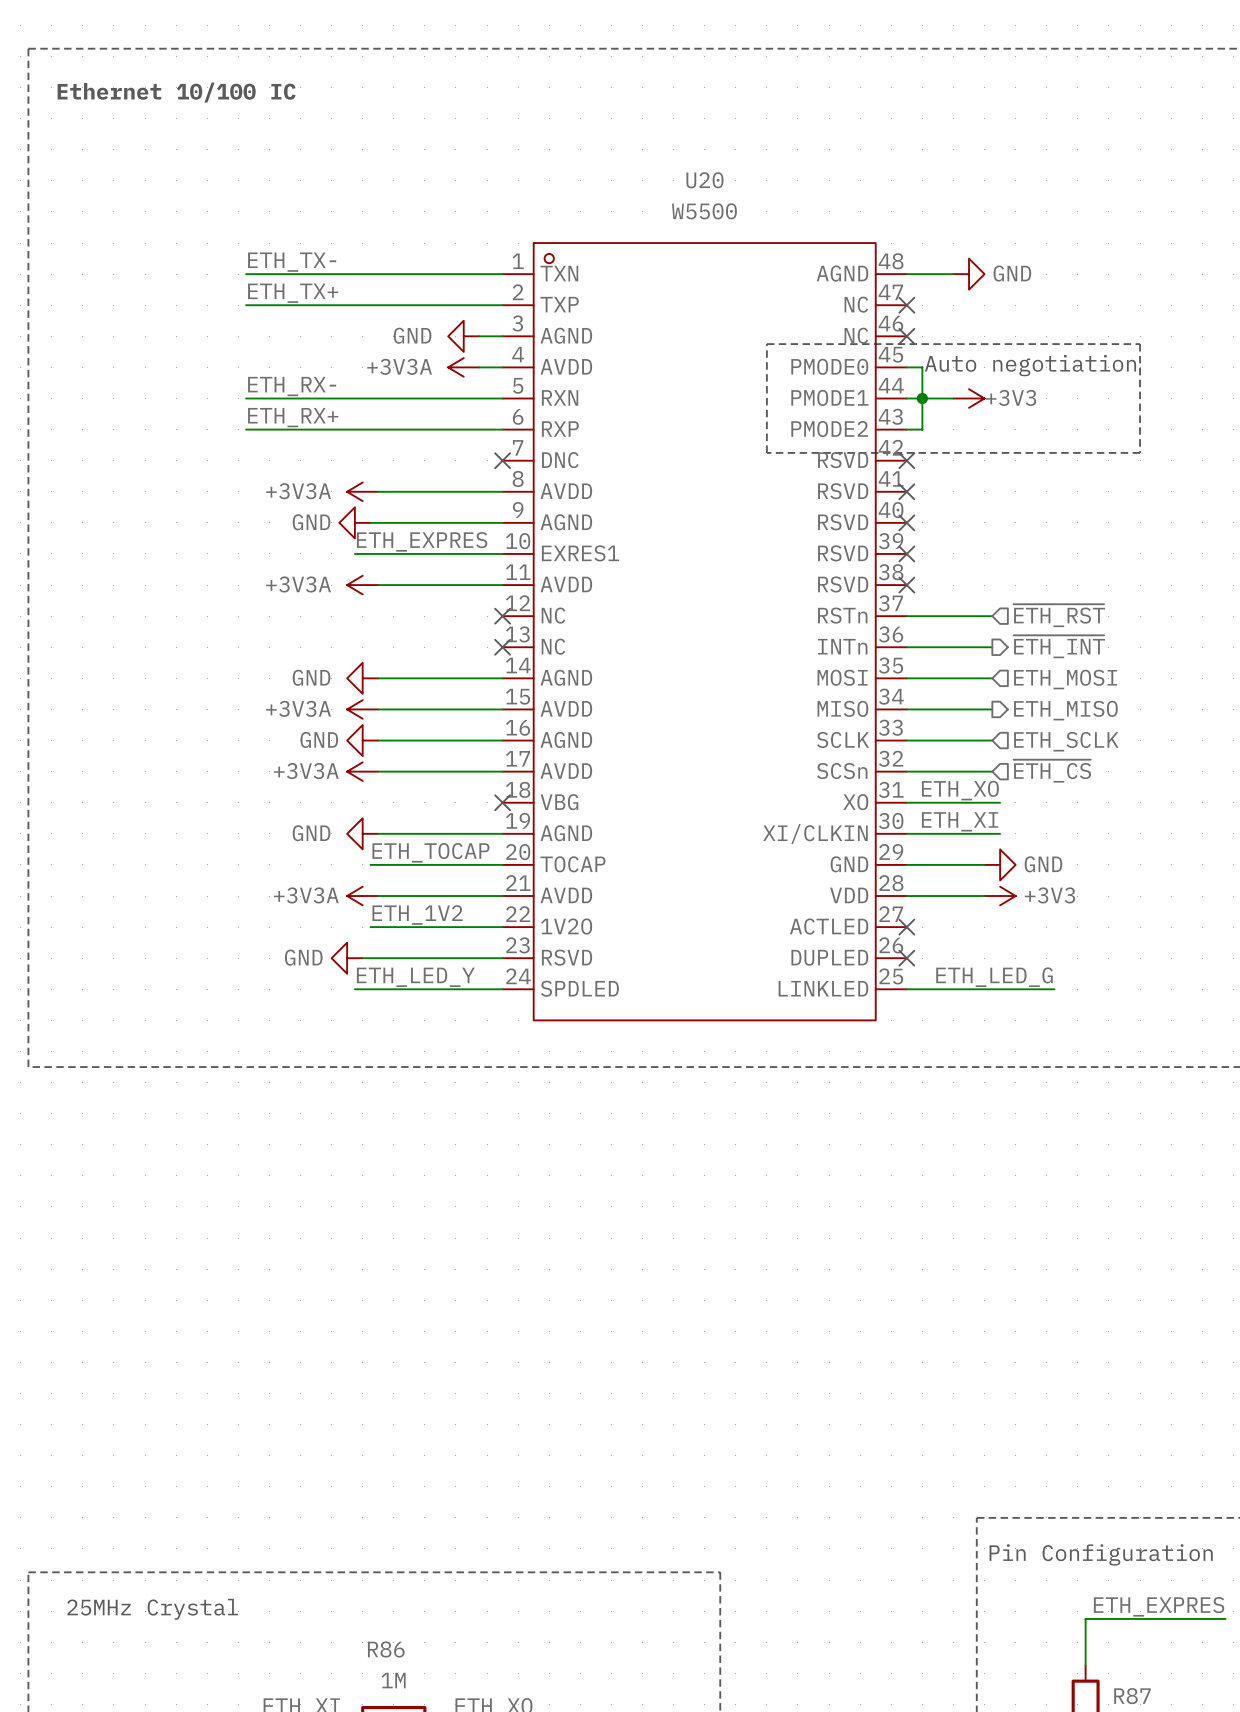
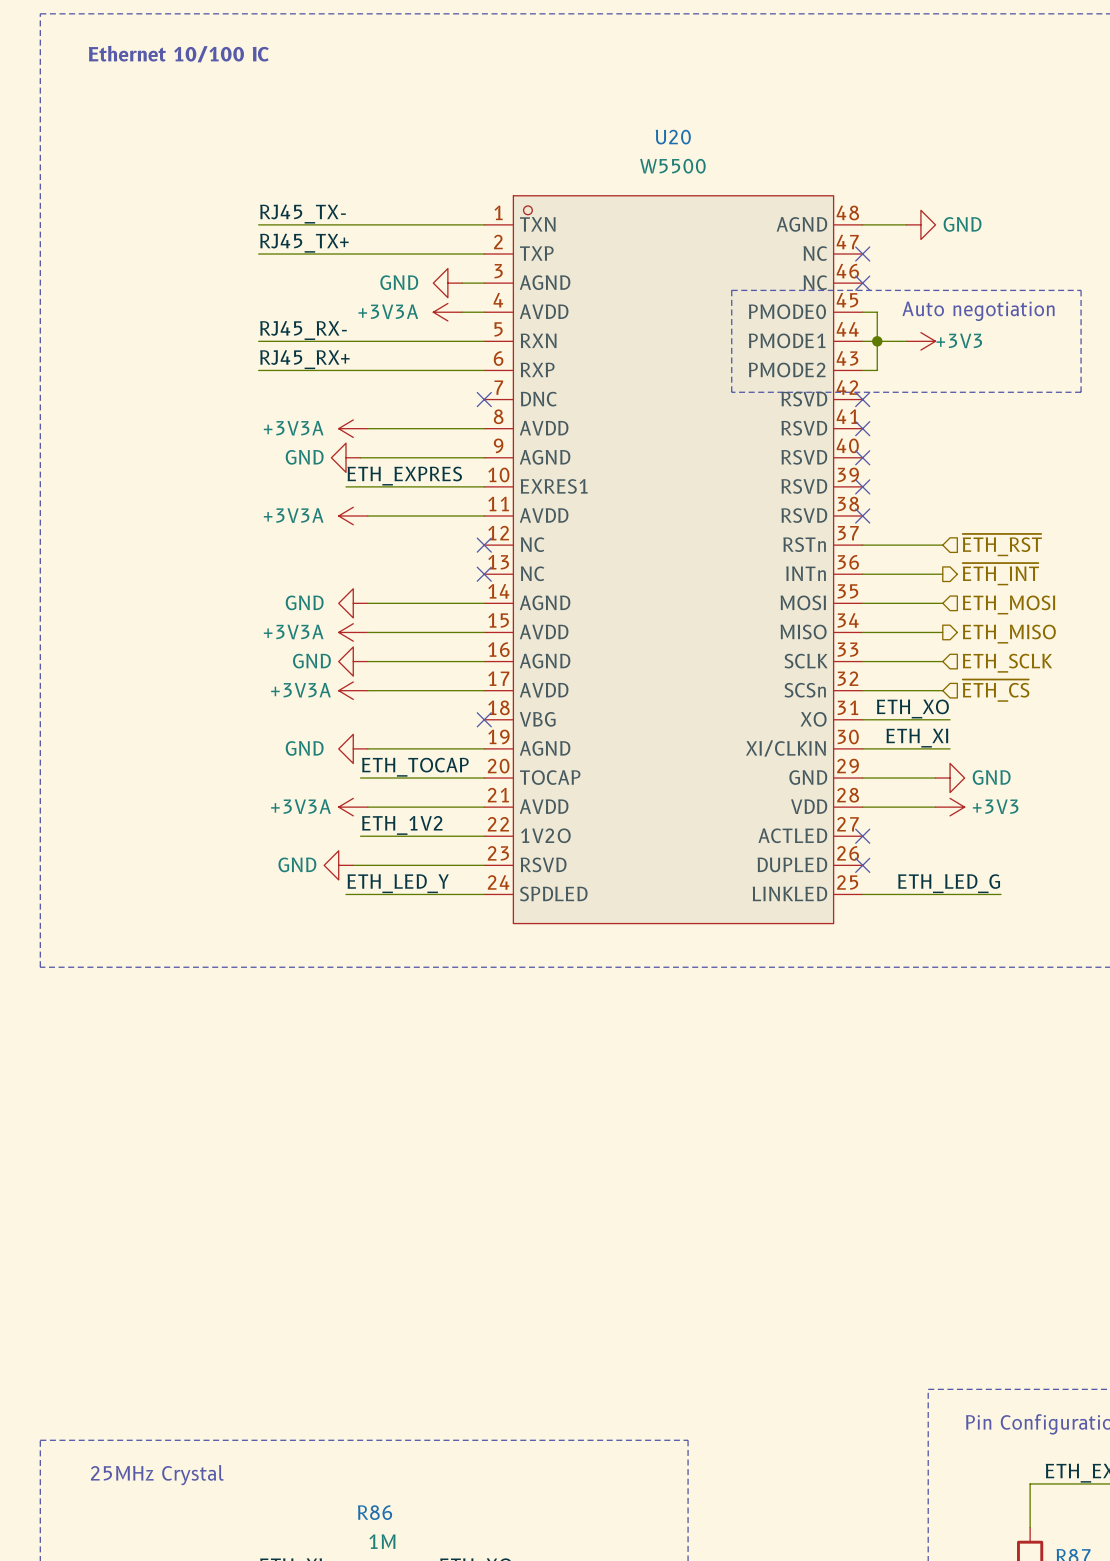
label: ETH_TX- (292, 262) -> none
label: none -> RJ45_TX- (302, 214)
wire: (246, 274) (261, 274) -> none
label: ETH_TX+ (293, 293) -> none
label: none -> RJ45_TX+ (304, 243)
wire: (246, 305) (261, 305) -> none
label: ETH_RX- (292, 386) -> none
label: none -> RJ45_RX- (303, 330)
wire: (246, 398) (261, 398) -> none
label: ETH_RX+ (293, 417) -> none
label: none -> RJ45_RX+ (304, 359)
wire: (246, 429) (261, 429) -> none

